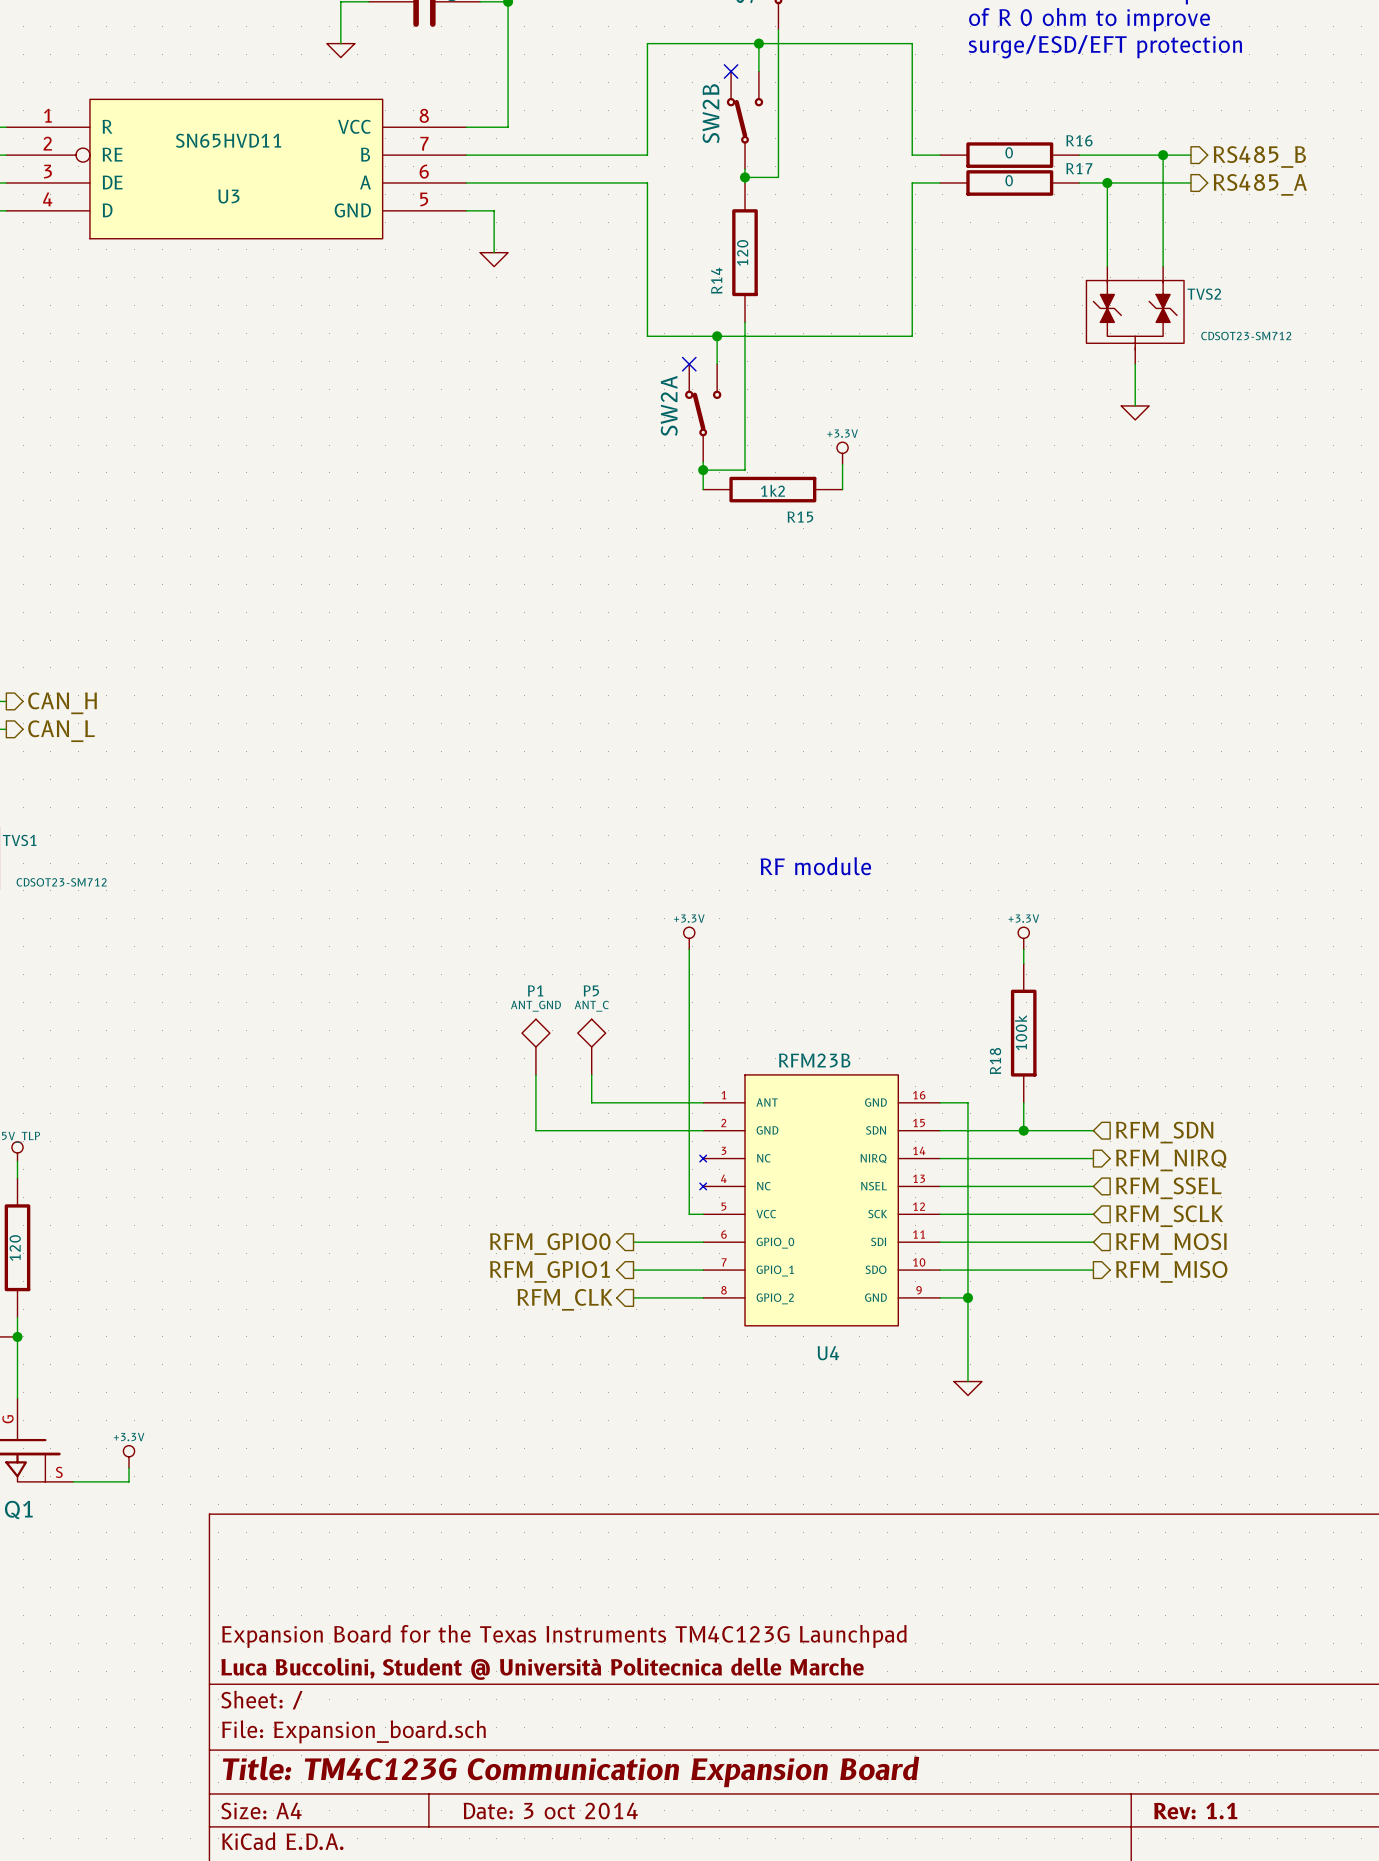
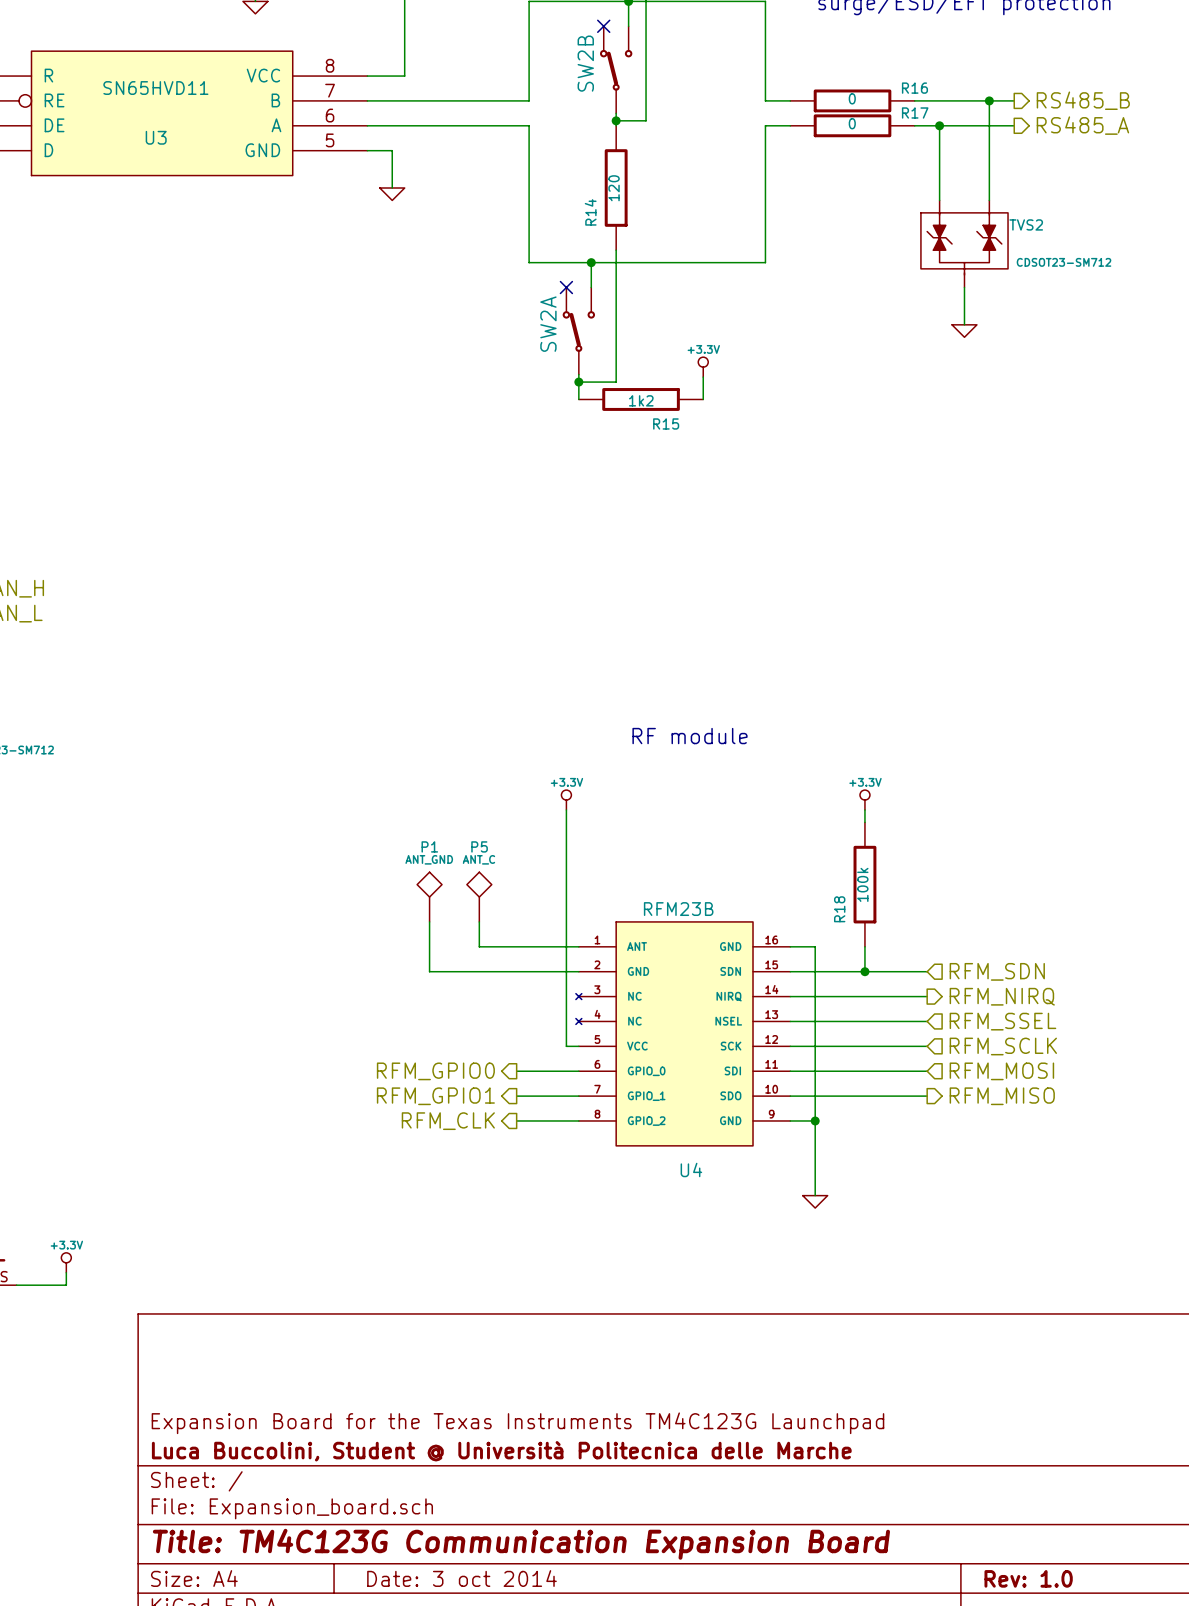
title block: Rev: 1.1 (1195, 1811) -> Rev: 1.0 (1028, 1578)

